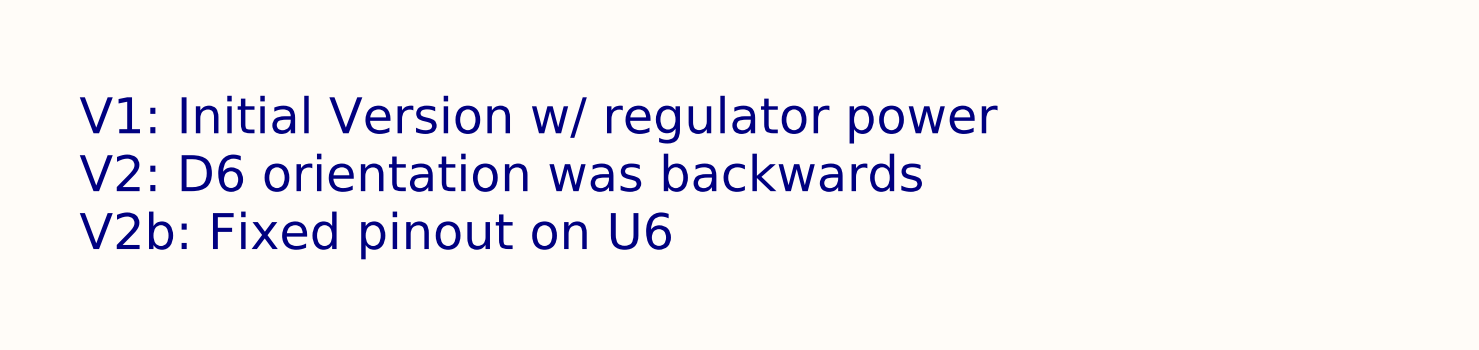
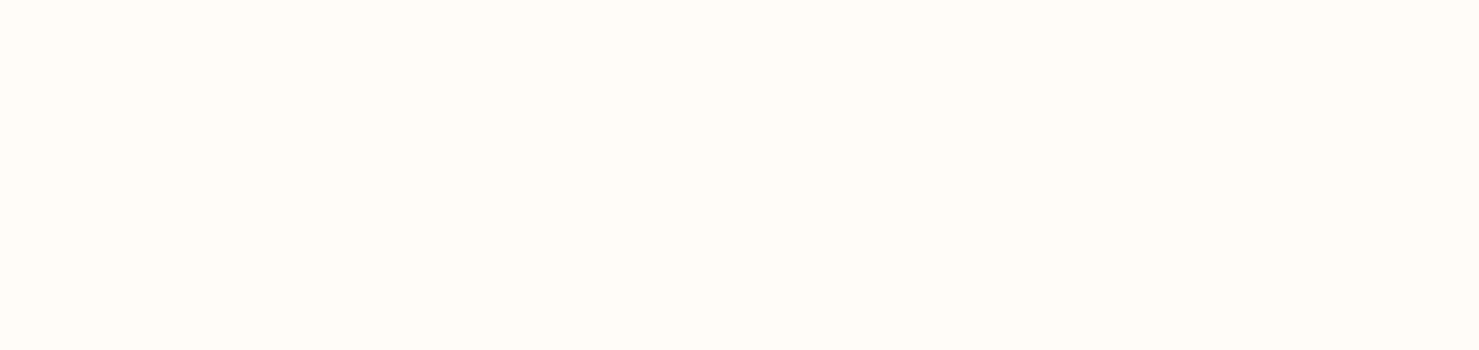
text: V1: Initial Version w/ regulator power (538, 119) -> none
text: V2: D6 orientation was backwards (500, 172) -> none
text: V2b: Fixed pinout on U6 (375, 235) -> none

